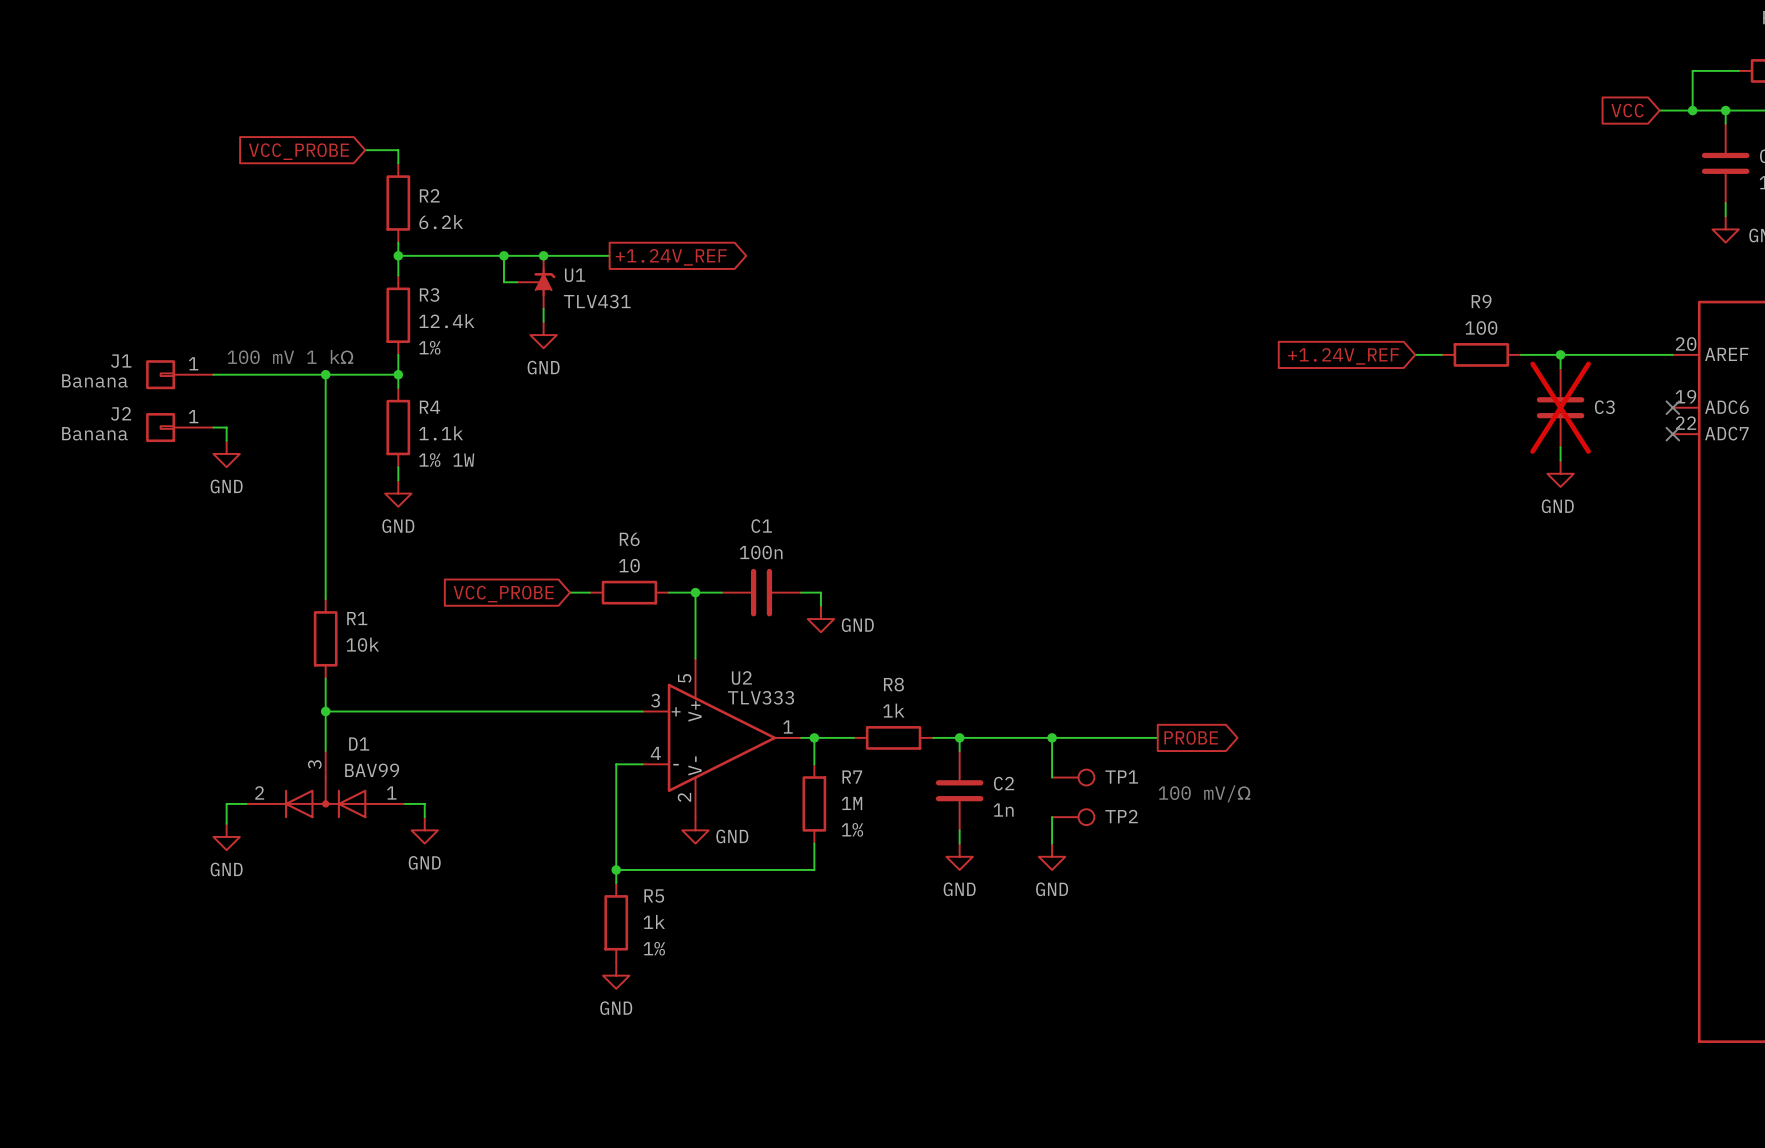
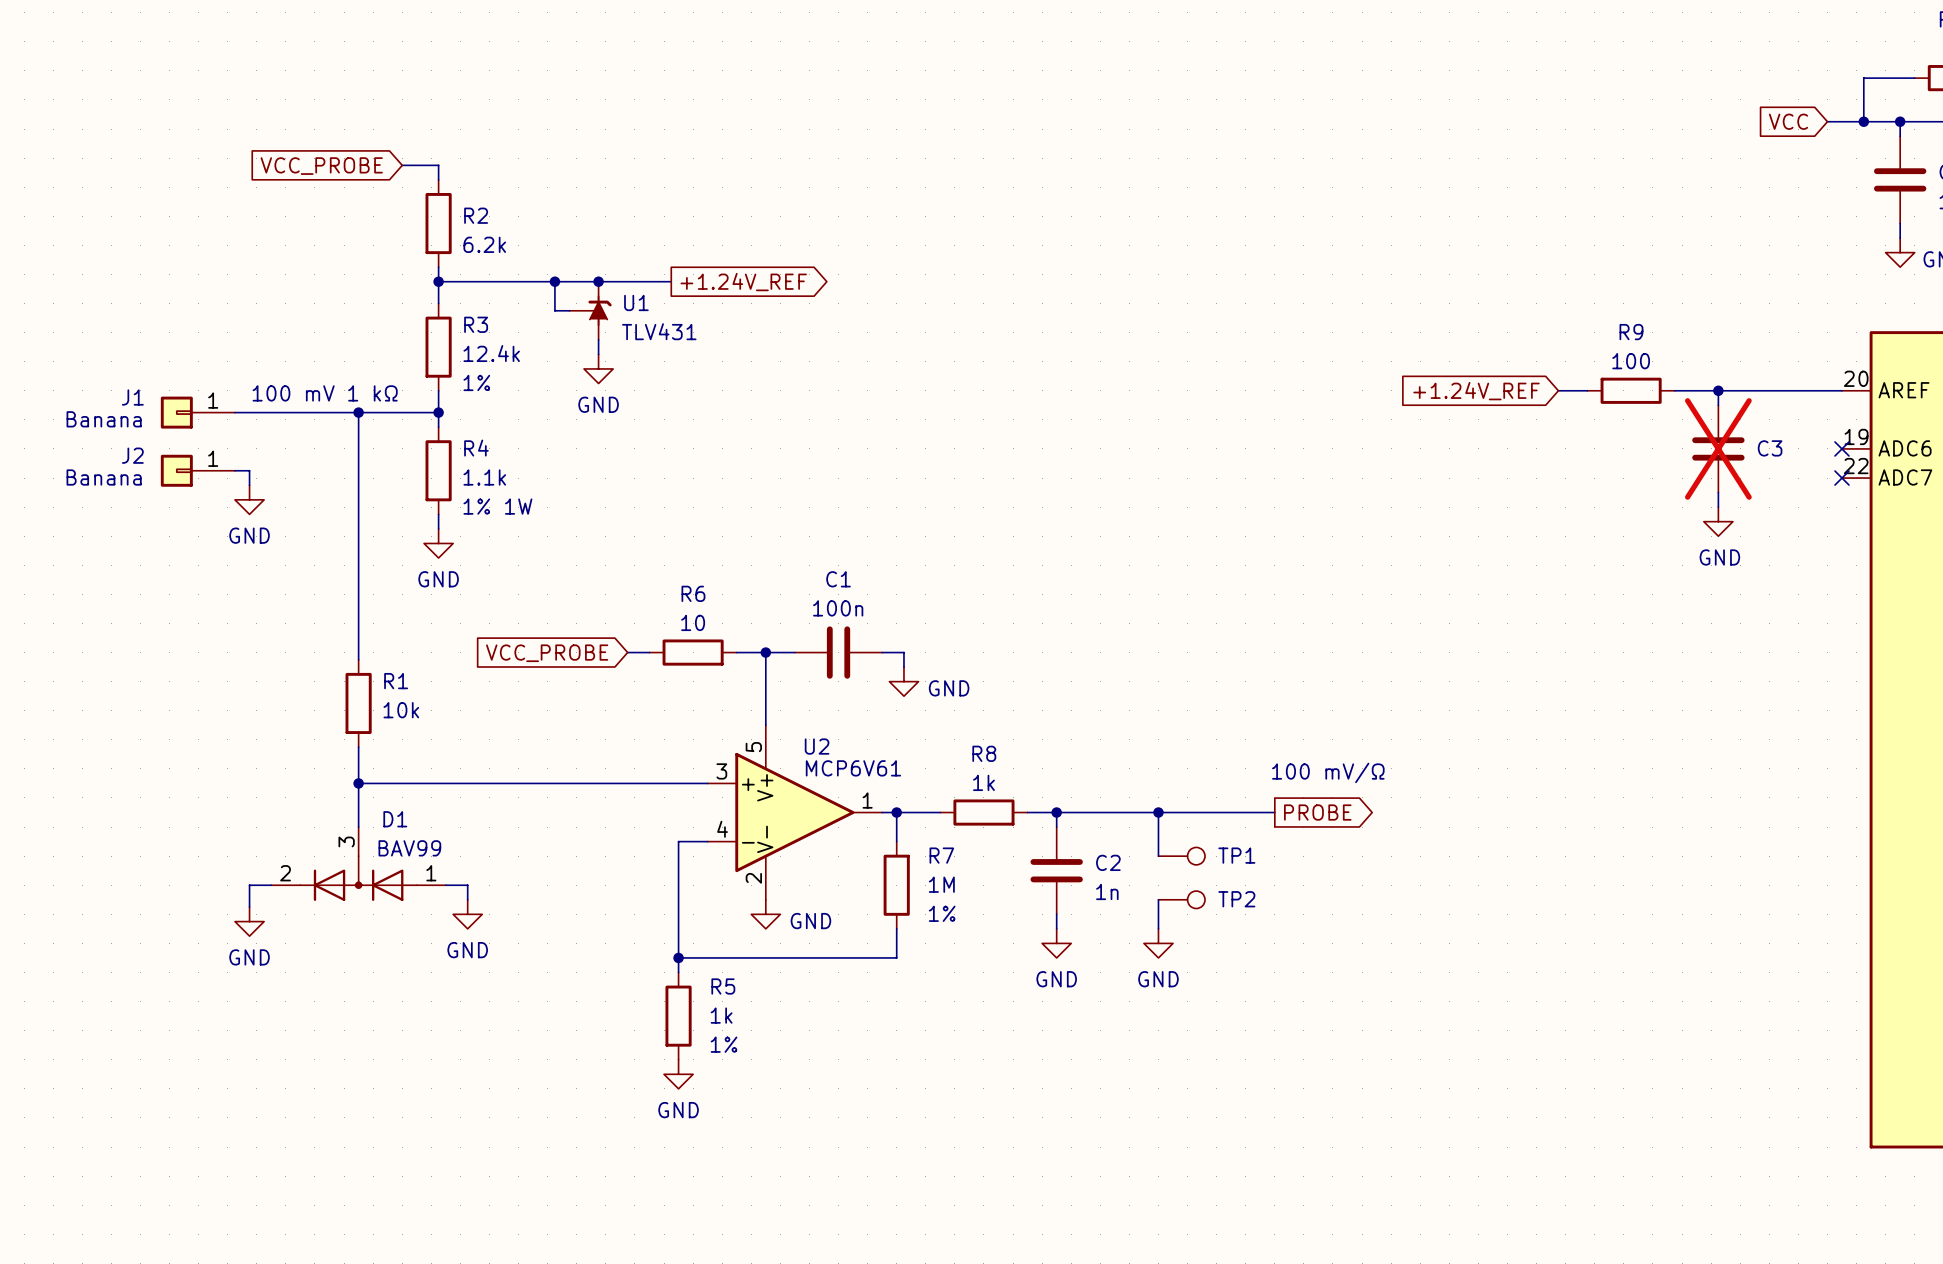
U2 value: TLV333 (760, 697) -> MCP6V61 (853, 768)
text position: 100 mV/Ω (1204, 793) -> 100 mV/Ω (1328, 772)

